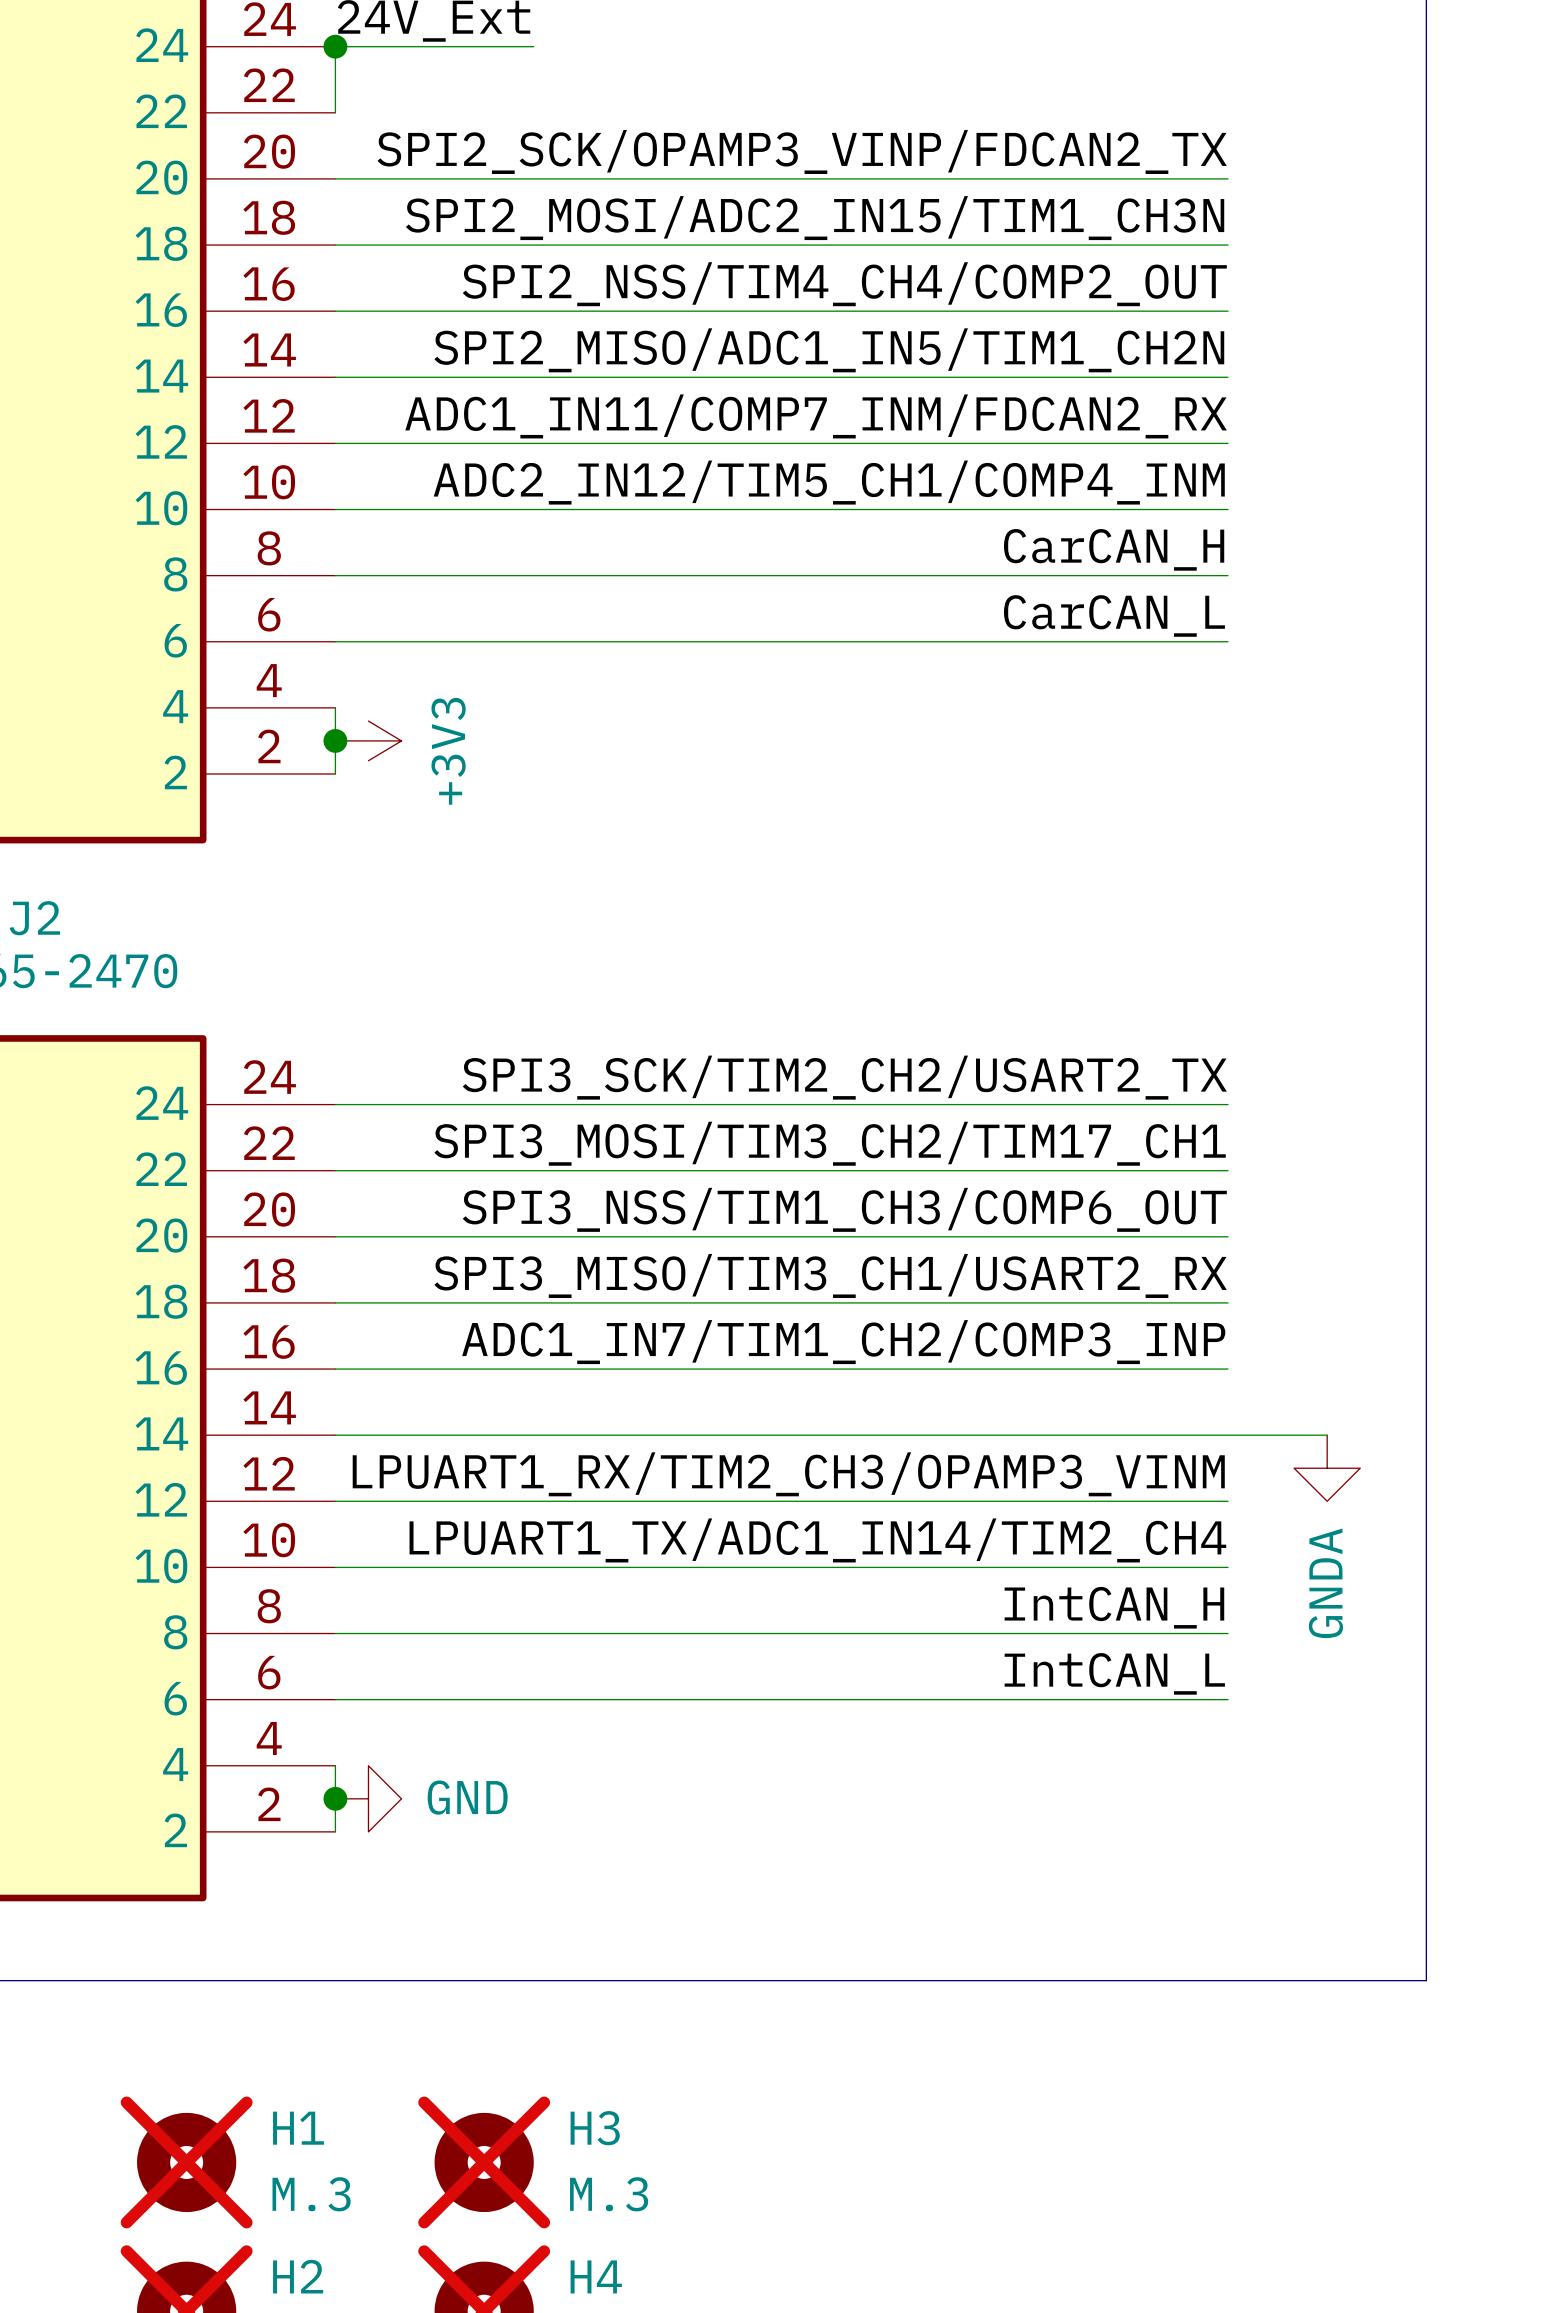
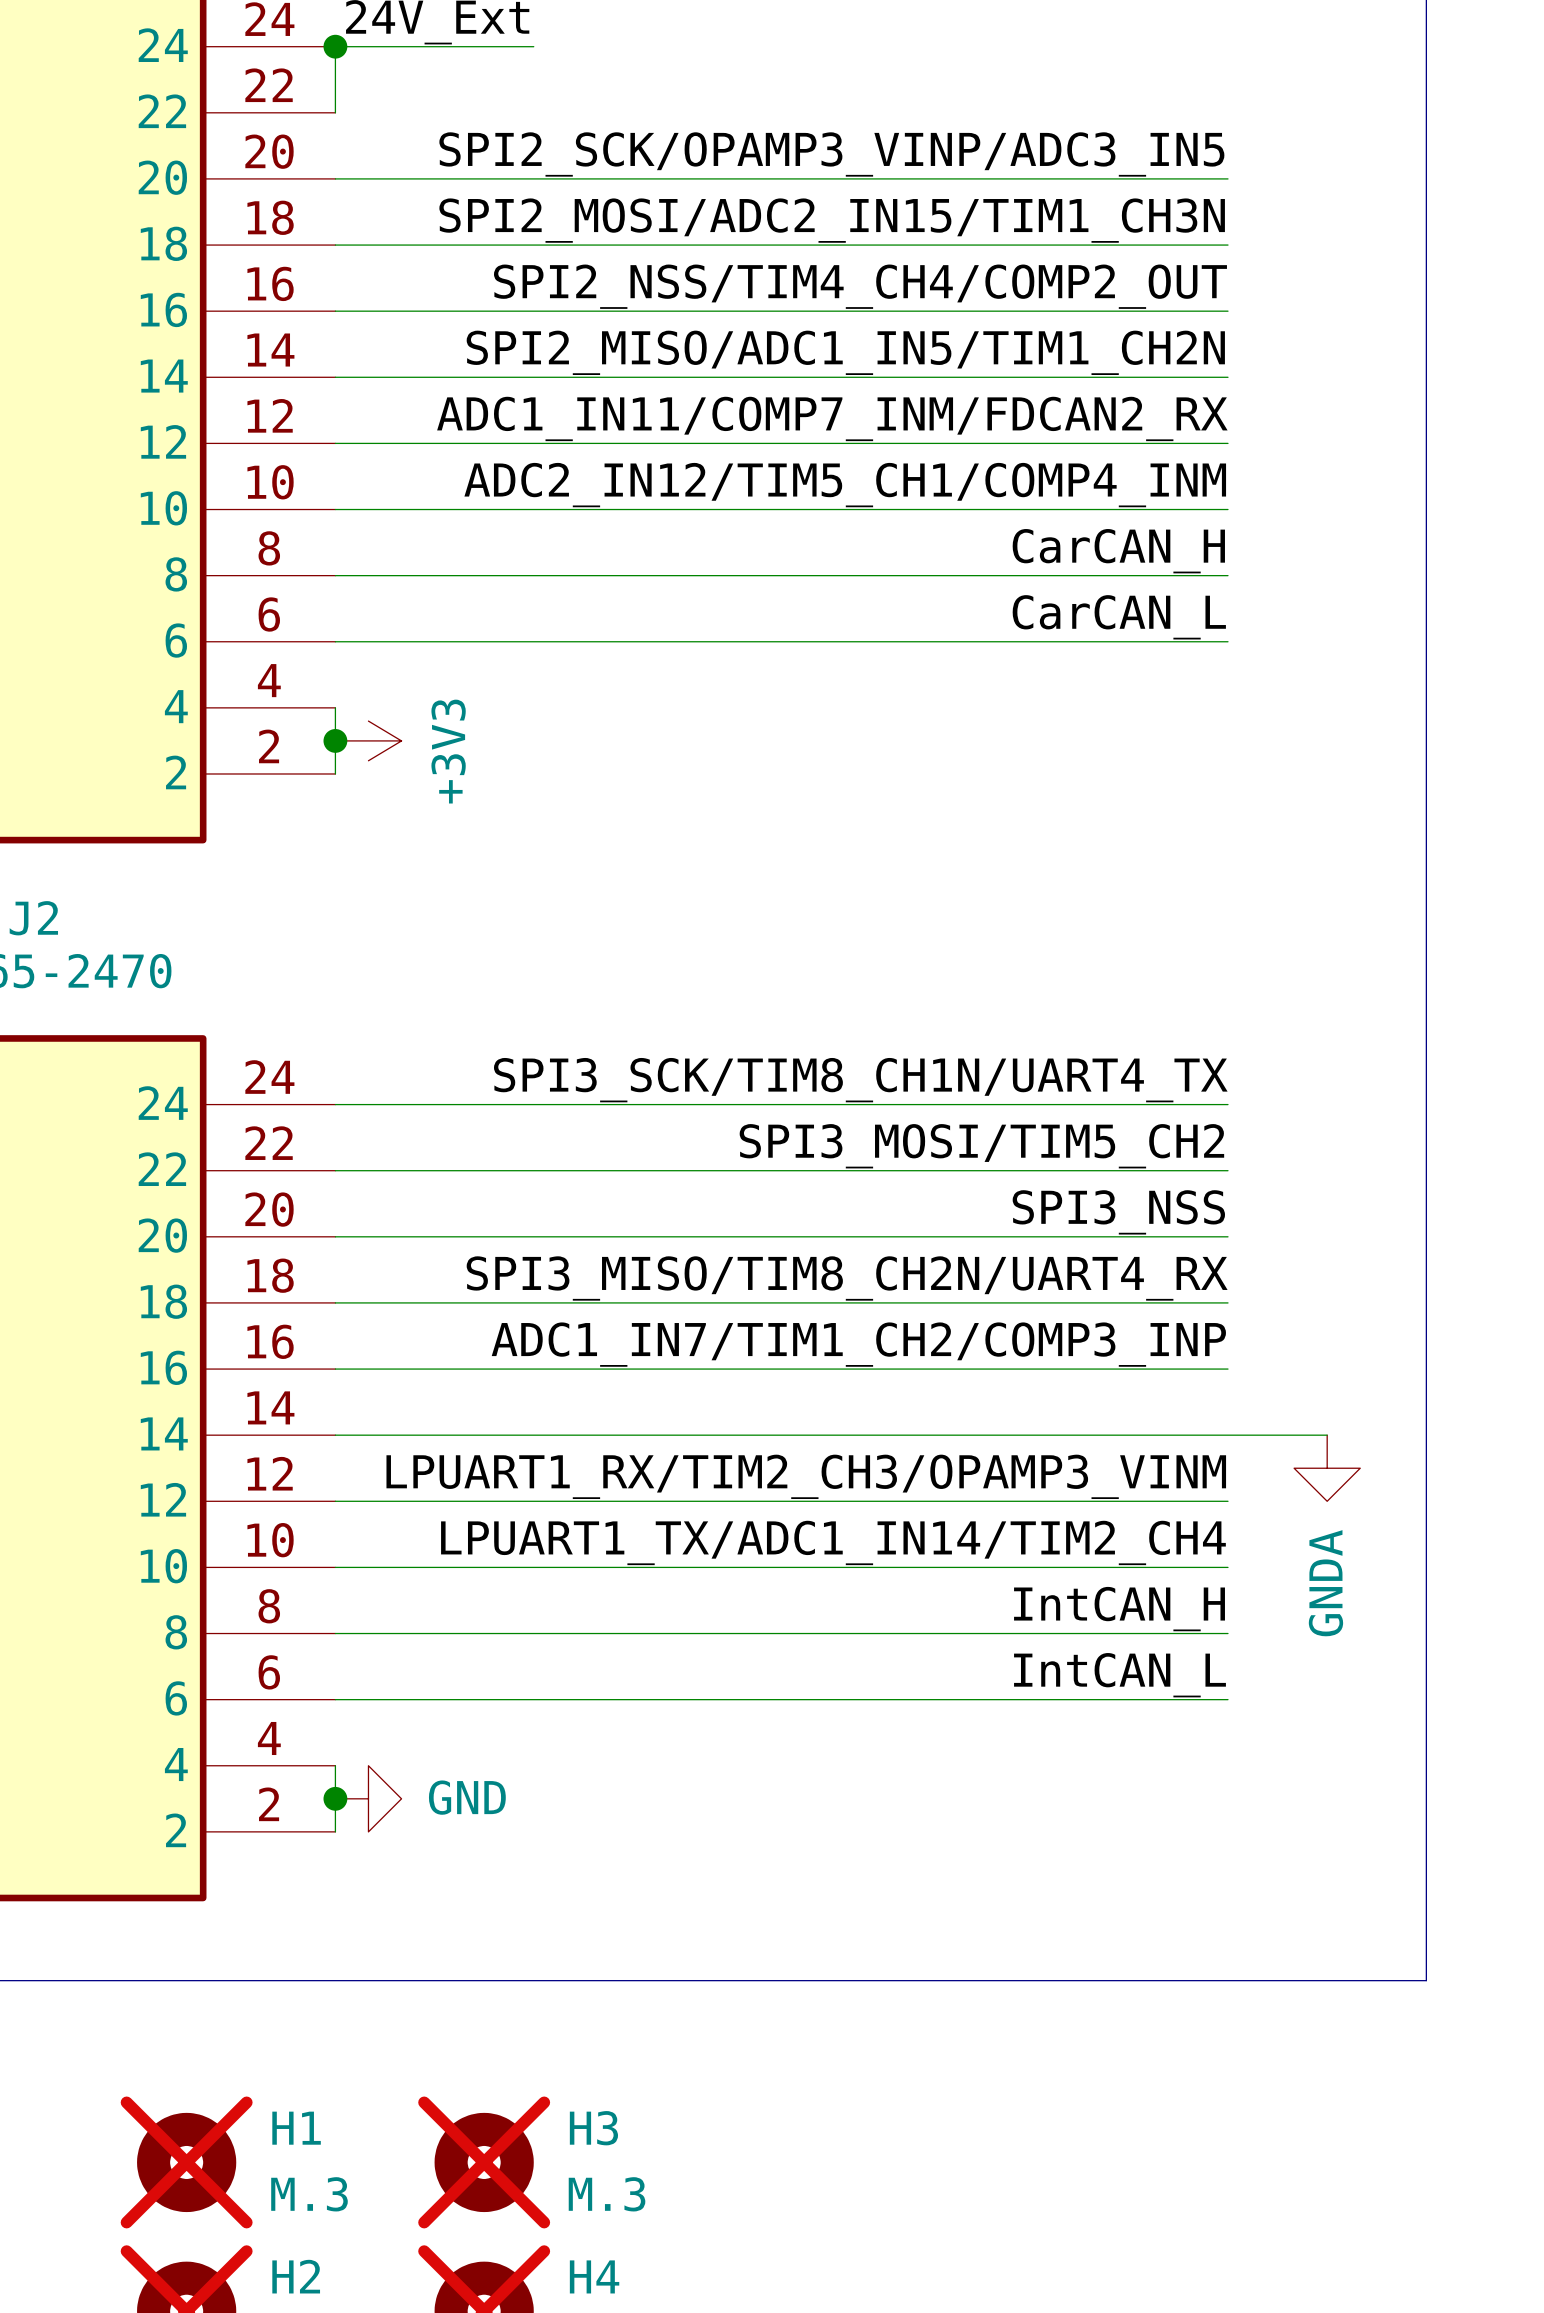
label: SPI2_SCK/OPAMP3_VINP/FDCAN2_TX (802, 151) -> SPI2_SCK/OPAMP3_VINP/ADC3_IN5 (831, 154)
label: SPI3_SCK/TIM2_CH2/USART2_TX (844, 1077) -> SPI3_SCK/TIM8_CH1N/UART4_TX (860, 1080)
label: SPI3_MOSI/TIM3_CH2/TIM17_CH1 (830, 1143) -> SPI3_MOSI/TIM5_CH2 (981, 1146)
label: SPI3_NSS/TIM1_CH3/COMP6_OUT (844, 1209) -> SPI3_NSS (1118, 1212)
label: SPI3_MISO/TIM3_CH1/USART2_RX (830, 1275) -> SPI3_MISO/TIM8_CH2N/UART4_RX (847, 1278)

